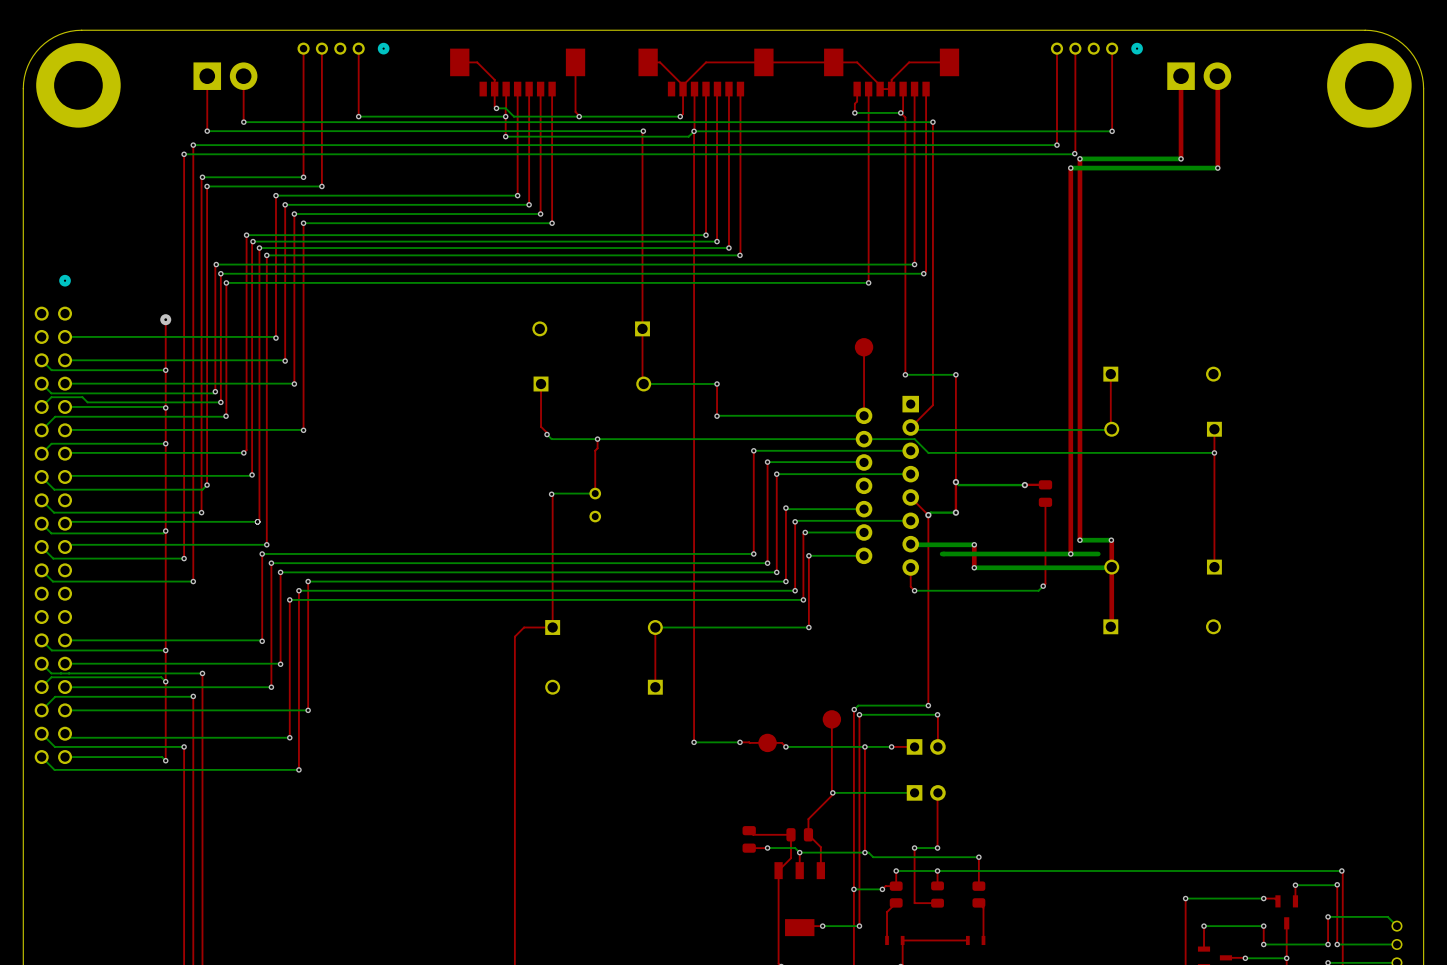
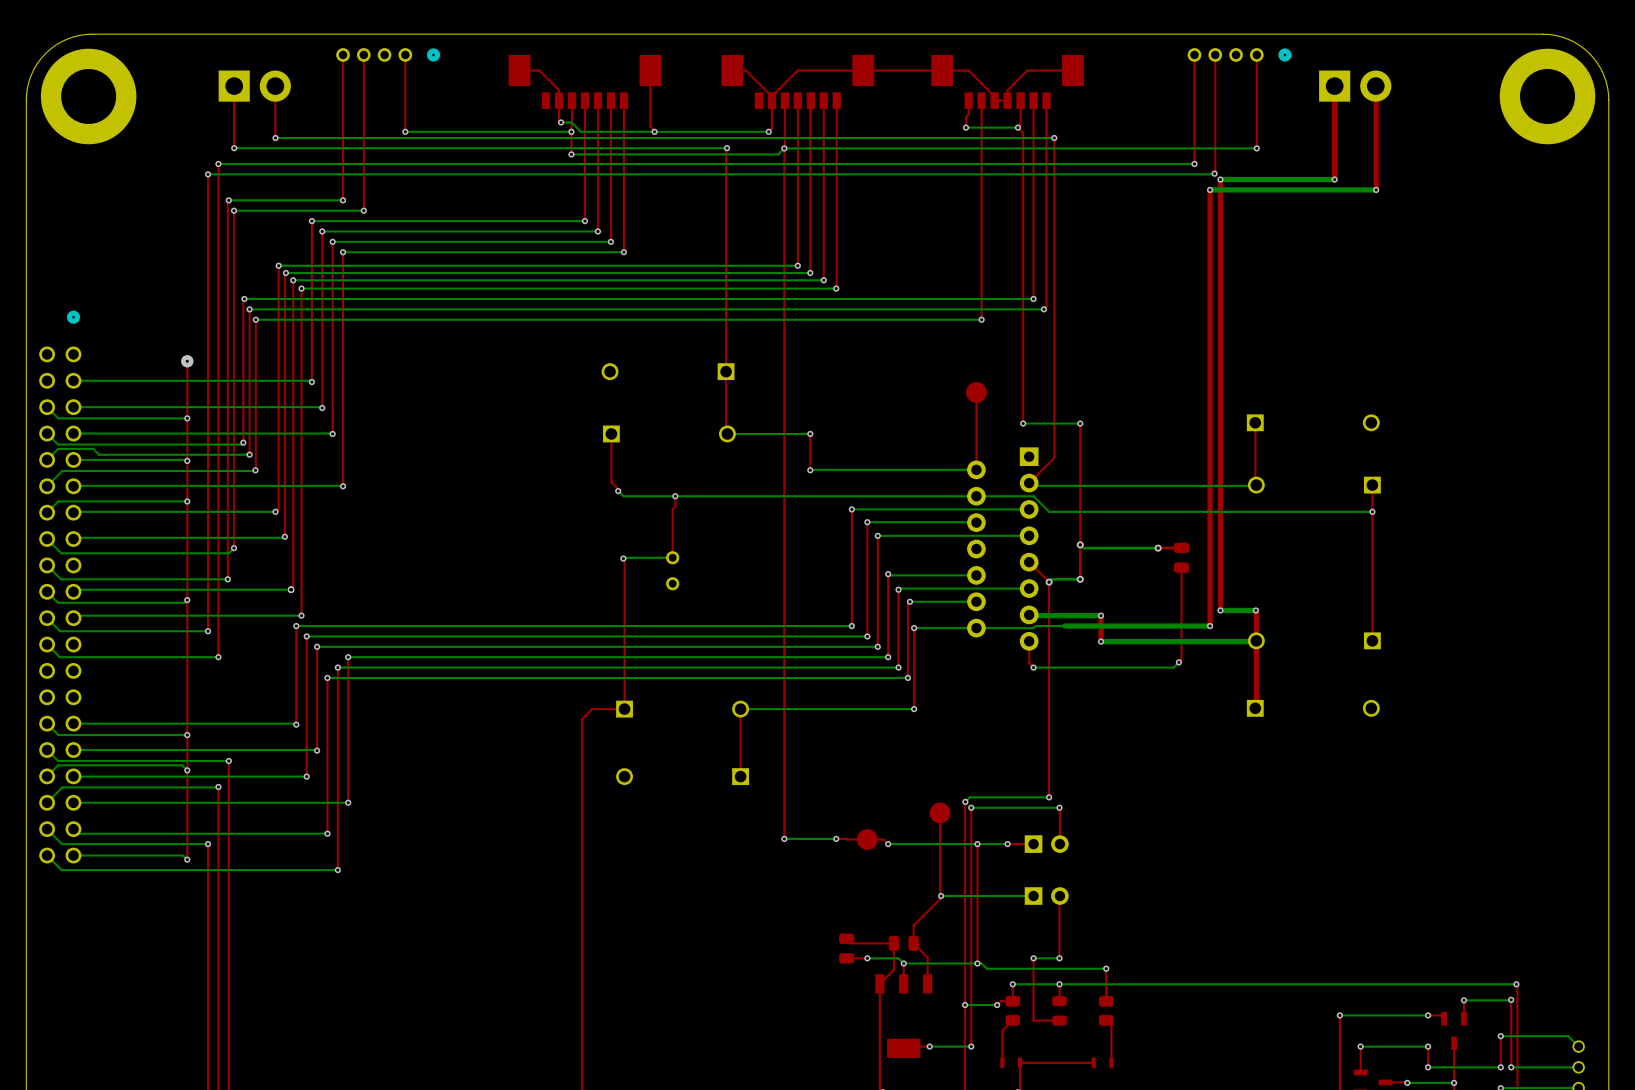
bottom track: none -> (1064, 626) (976, 628)
bottom track: (1098, 553) (1070, 553) -> none

